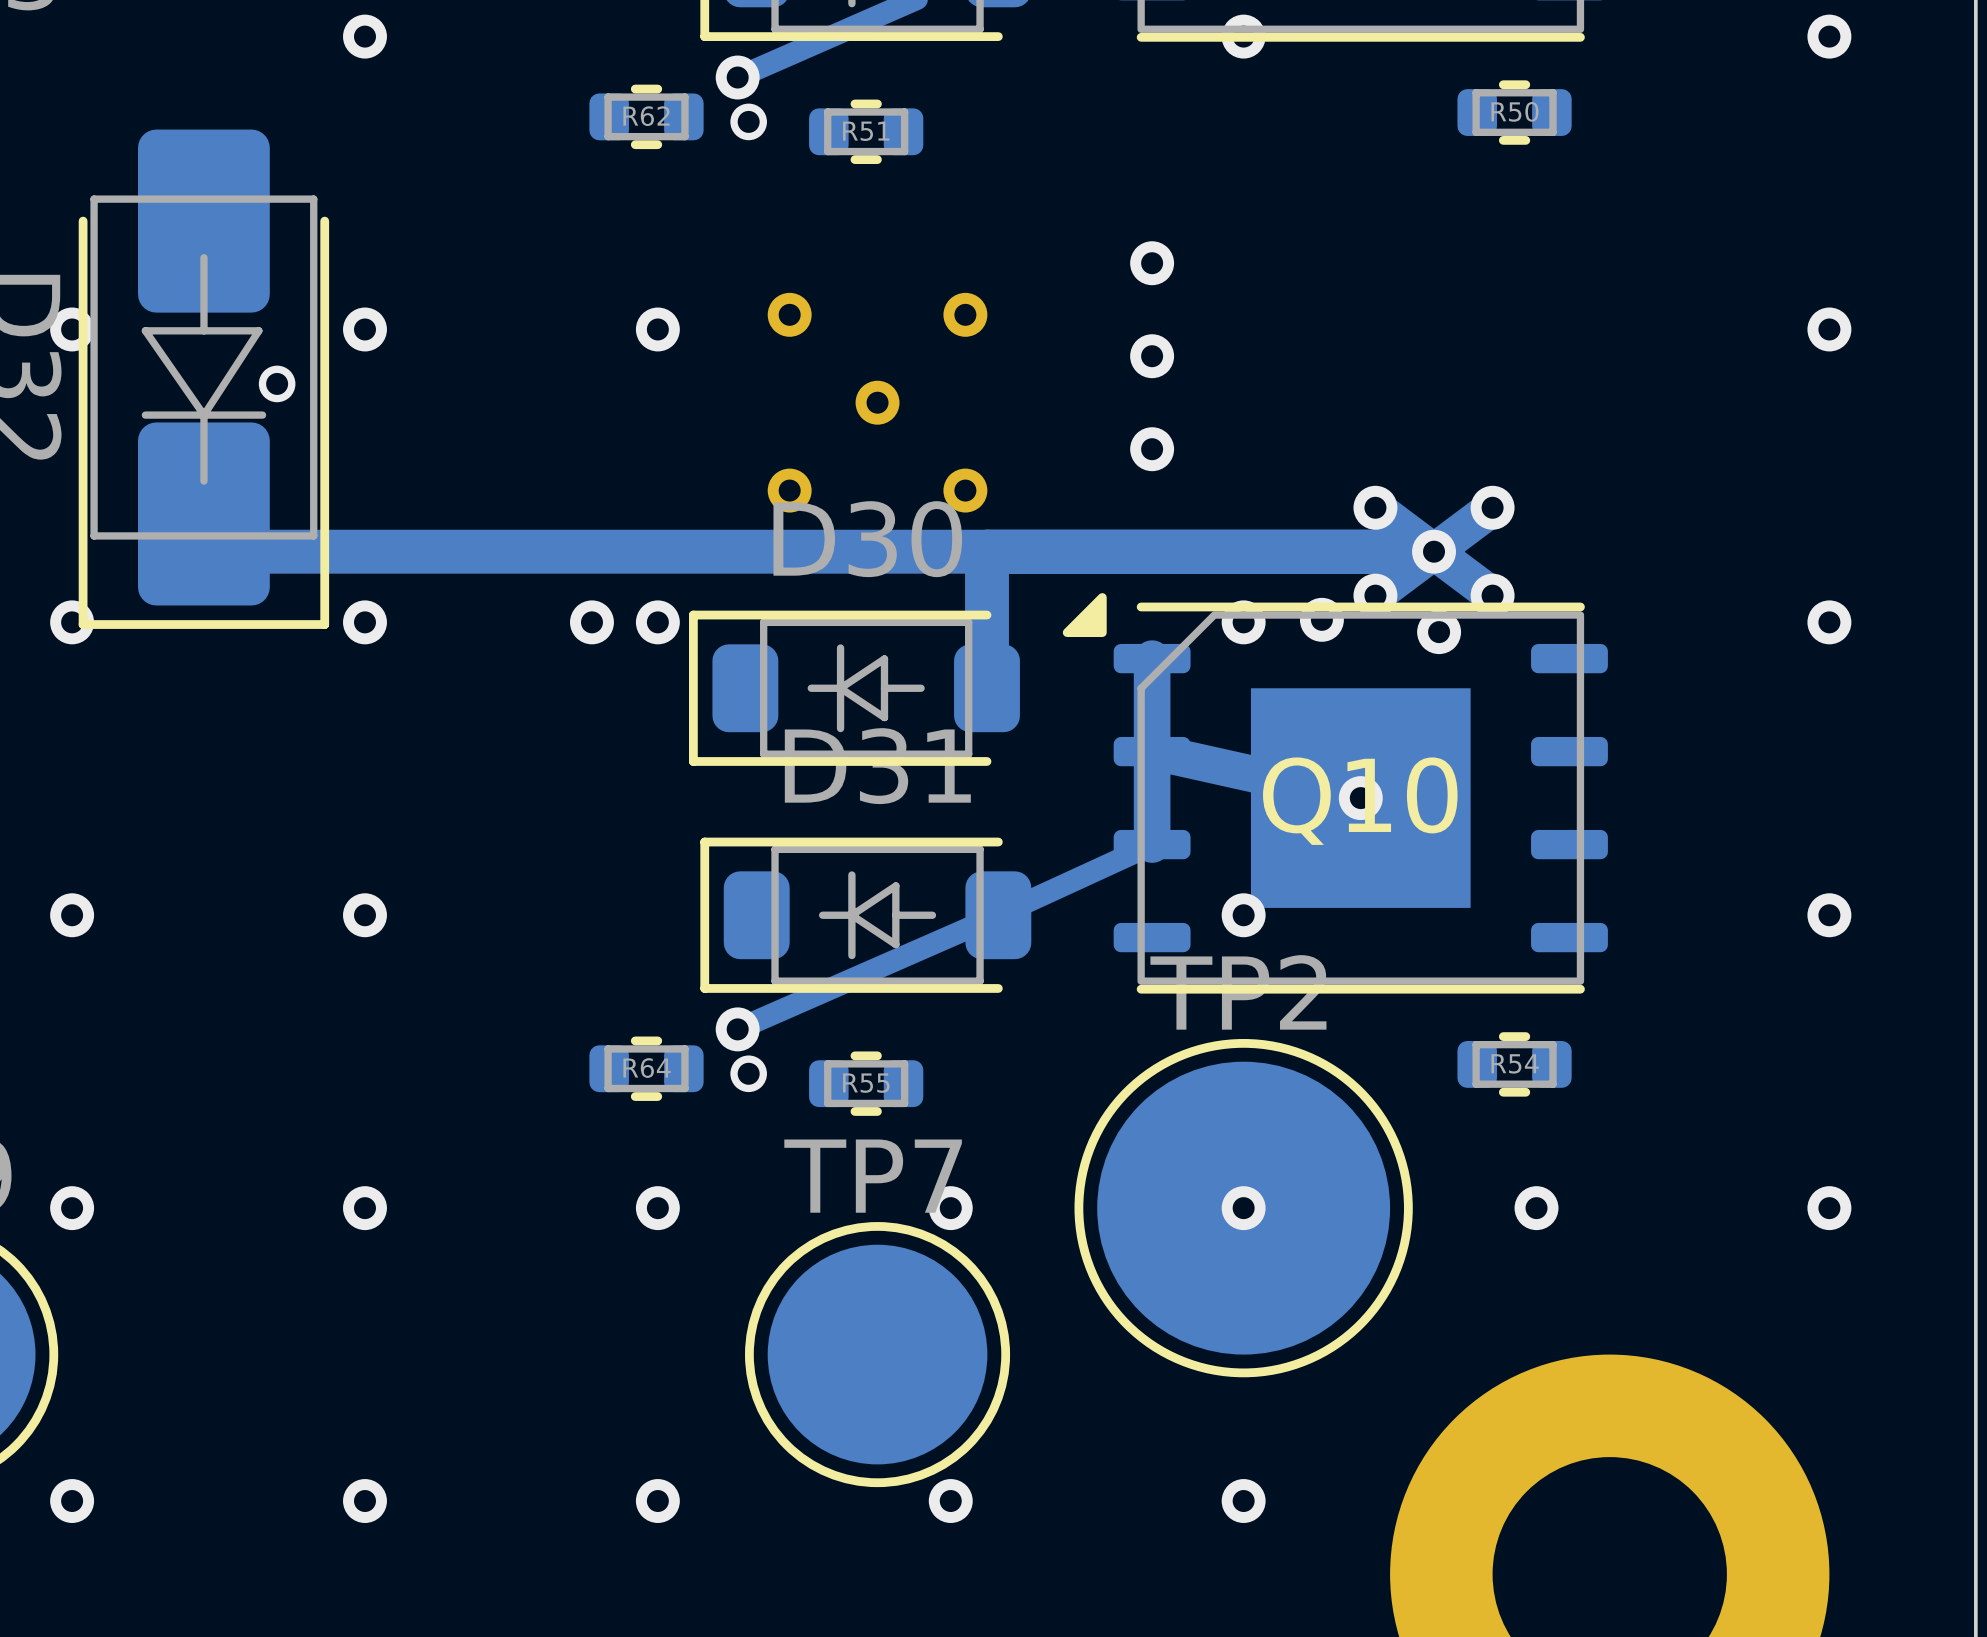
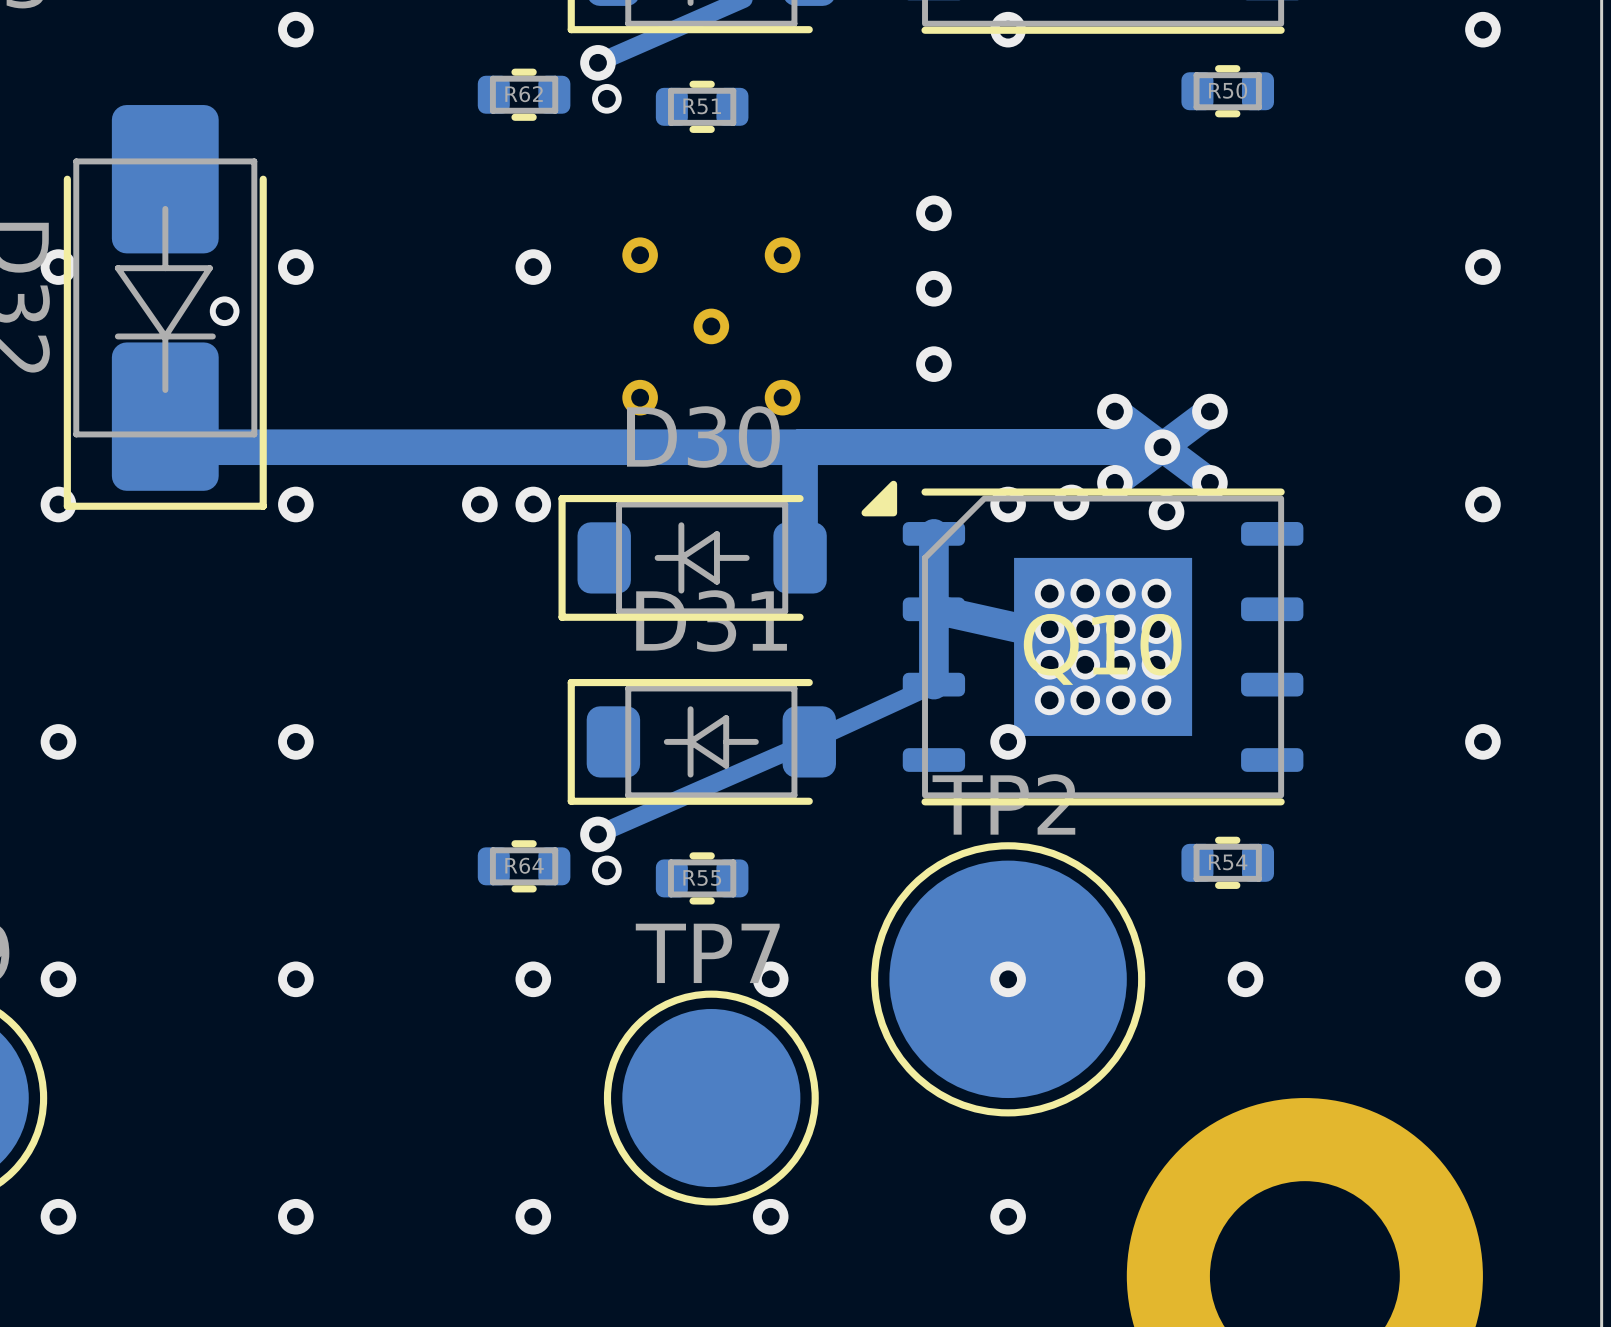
via: none -> (1049, 593)
via: none -> (1085, 593)
via: none -> (1120, 593)
via: none -> (1156, 593)
via: none -> (1049, 629)
via: none -> (1085, 629)
via: none -> (1120, 629)
via: none -> (1156, 629)
via: (1360, 798) -> none
via: none -> (1049, 664)
via: none -> (1085, 664)
via: none -> (1120, 664)
via: none -> (1156, 664)
via: none -> (1049, 700)
via: none -> (1085, 700)
via: none -> (1120, 700)
via: none -> (1156, 700)

